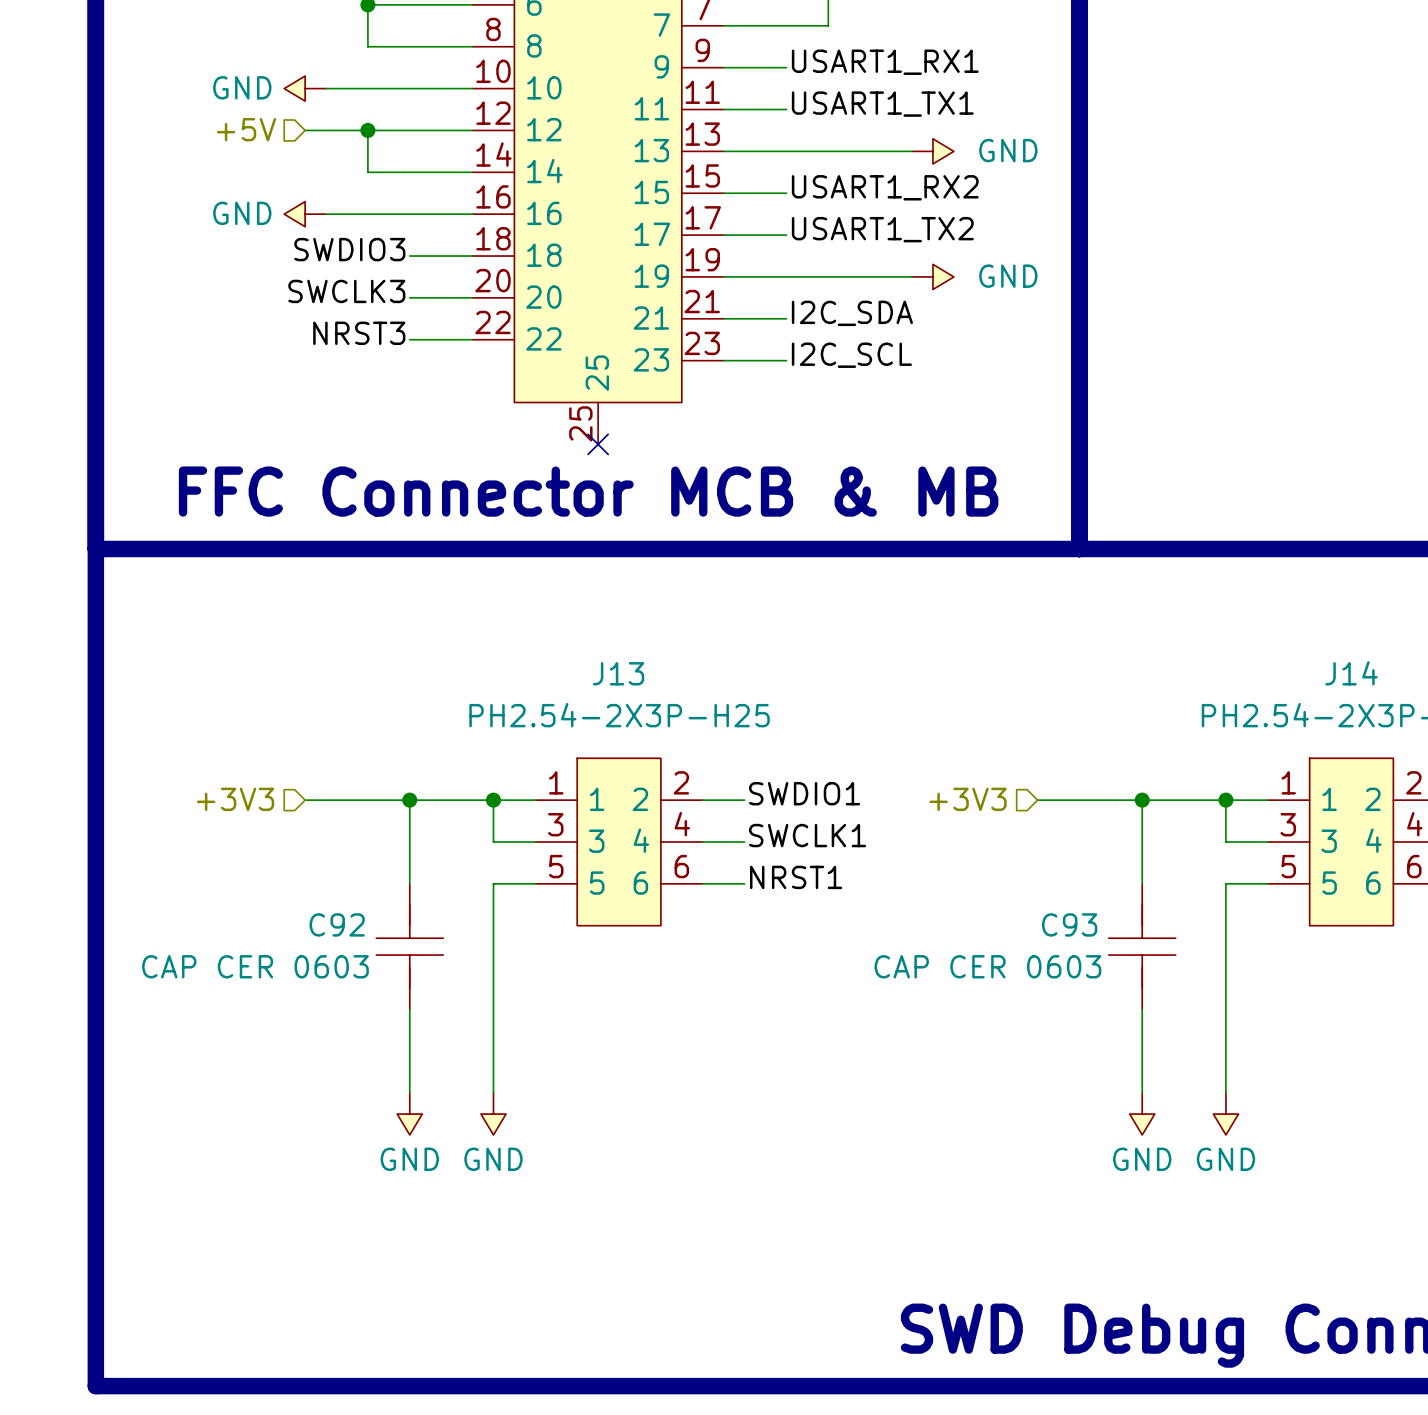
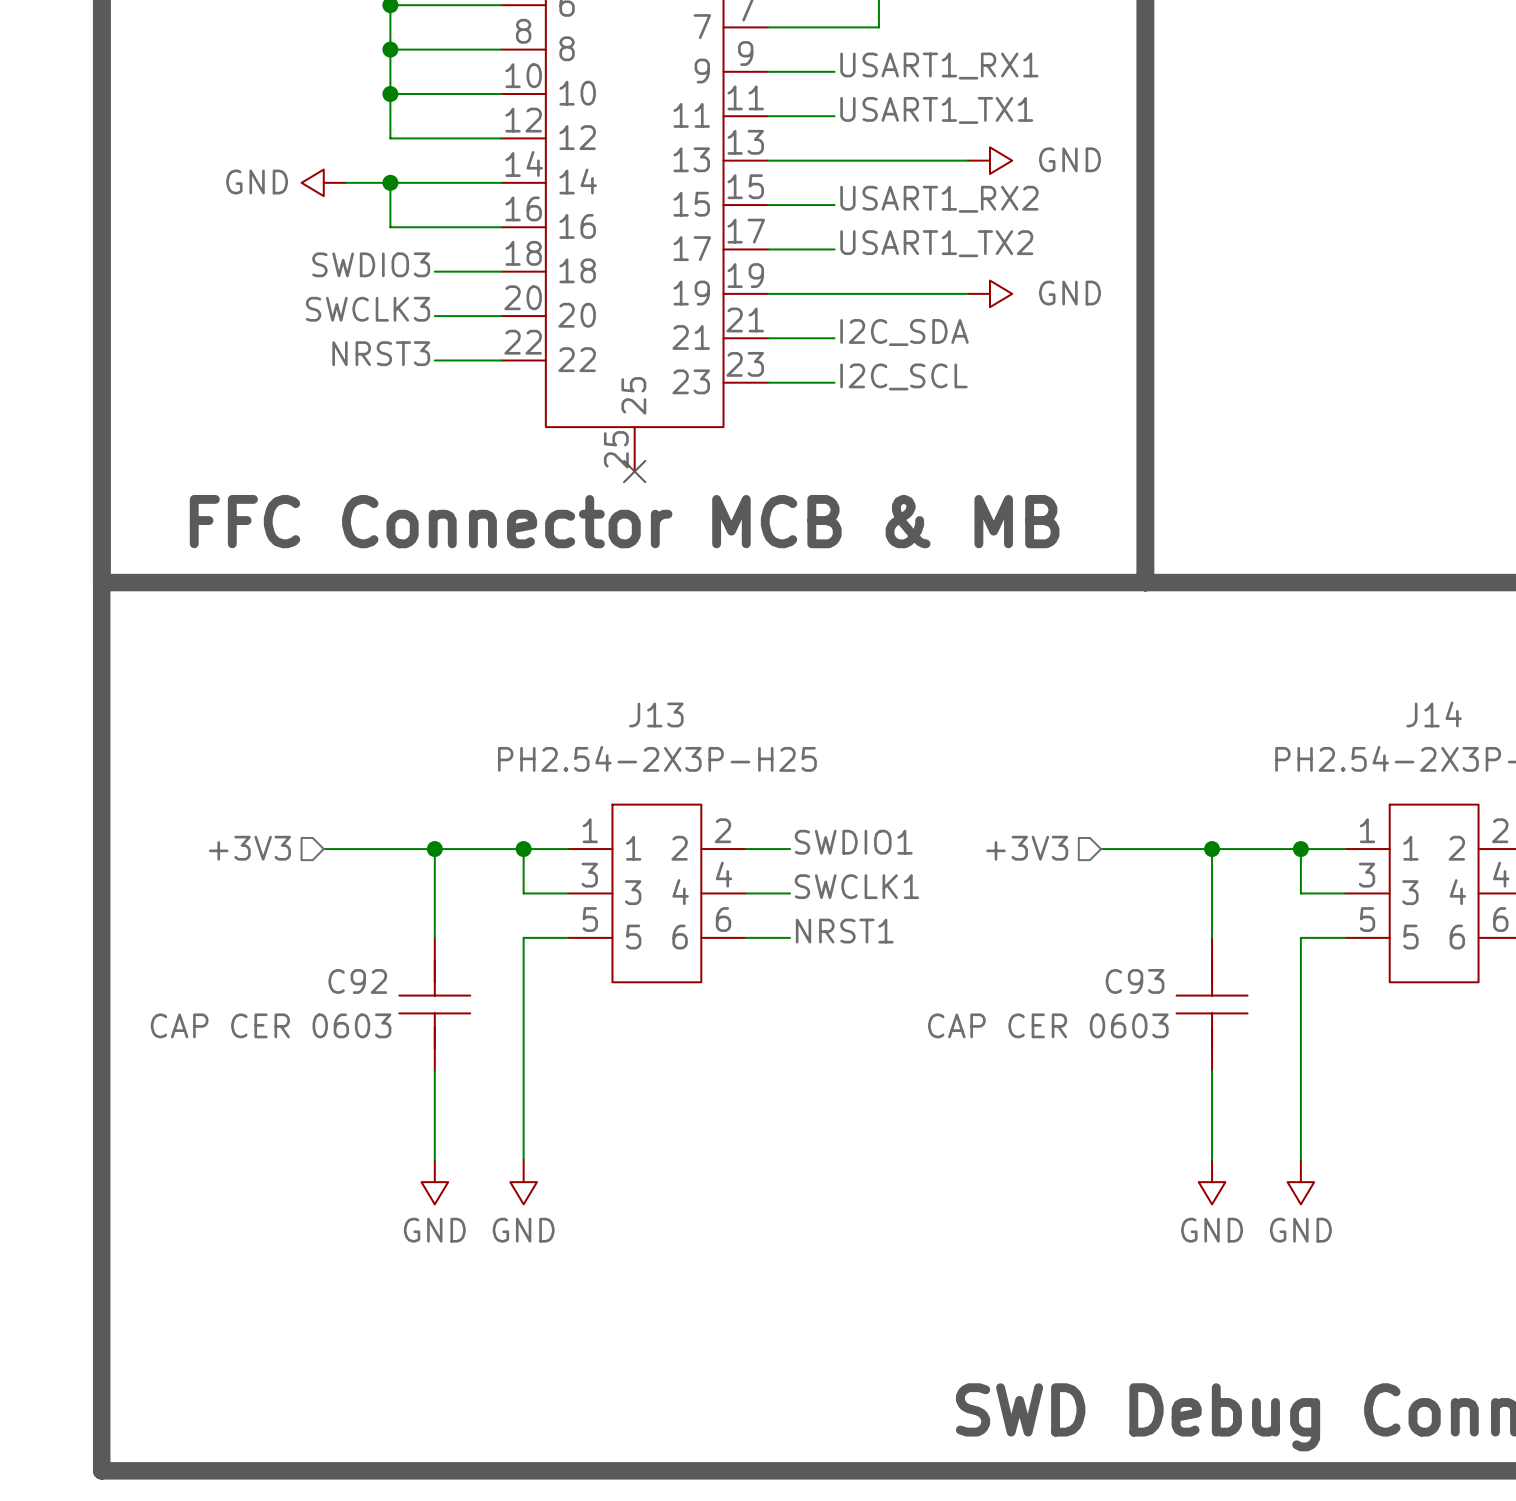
wire: none -> (390, 49) (390, 138)
junction: none -> (390, 49)
power symbol: GND (305, 88) -> none
wire: (326, 88) (367, 88) -> none
junction: none -> (390, 94)
hierarchical label: +5V (246, 129) -> none
wire: (305, 130) (367, 130) (367, 172) -> none
junction: (367, 130) -> none
power symbol: none -> GND (323, 182)
junction: none -> (390, 182)
power symbol: GND (305, 214) -> none
wire: (326, 214) (367, 214) -> (345, 182) (390, 182) (390, 227)

